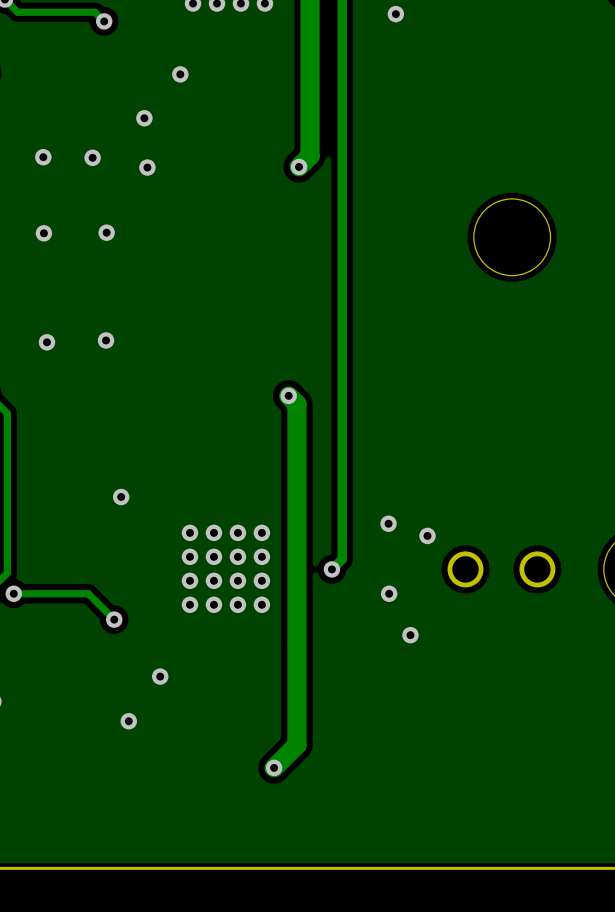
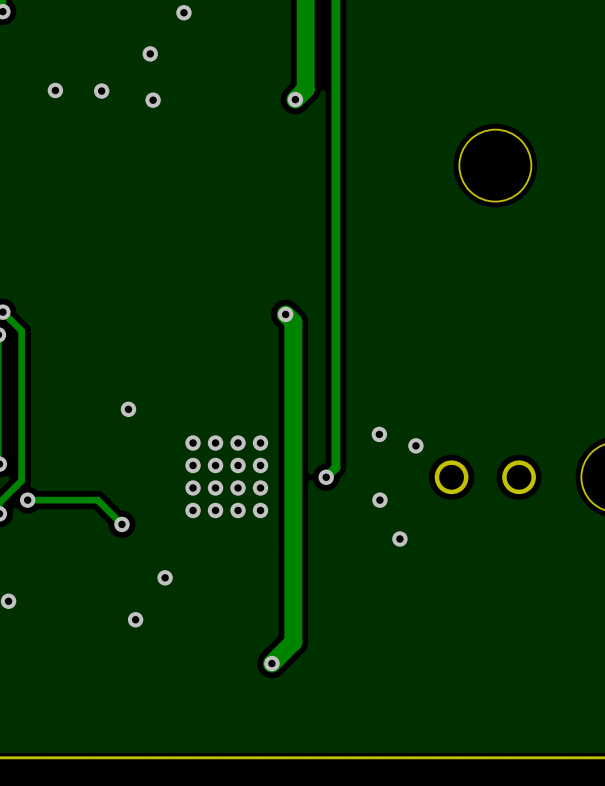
via: (106, 232) -> none
via: (43, 233) -> none
via: (106, 340) -> none
via: (46, 342) -> none

